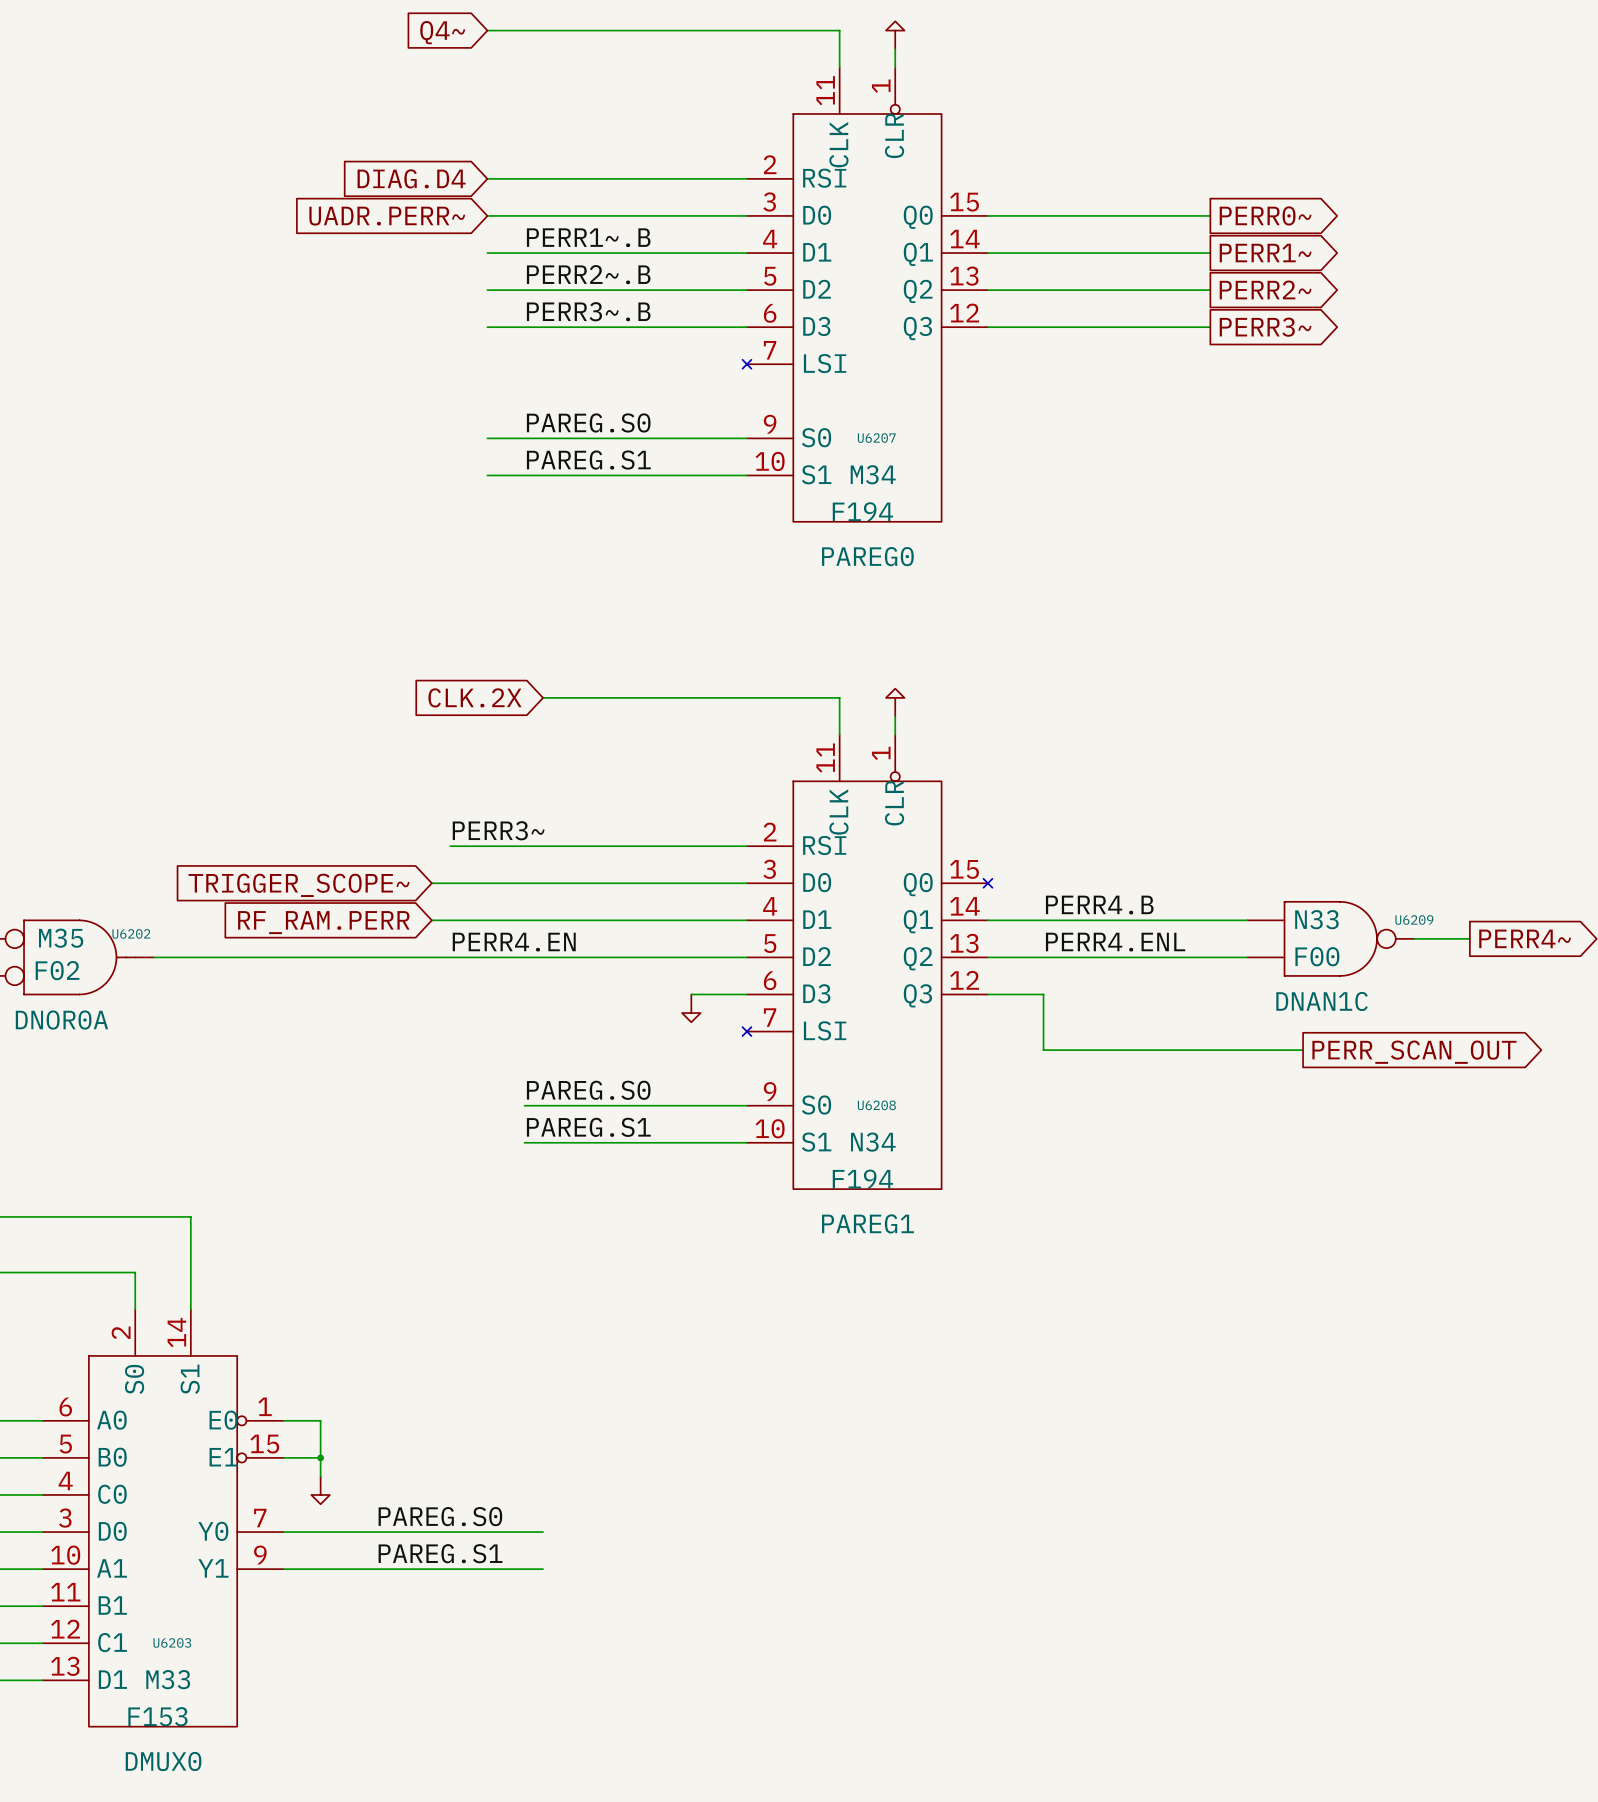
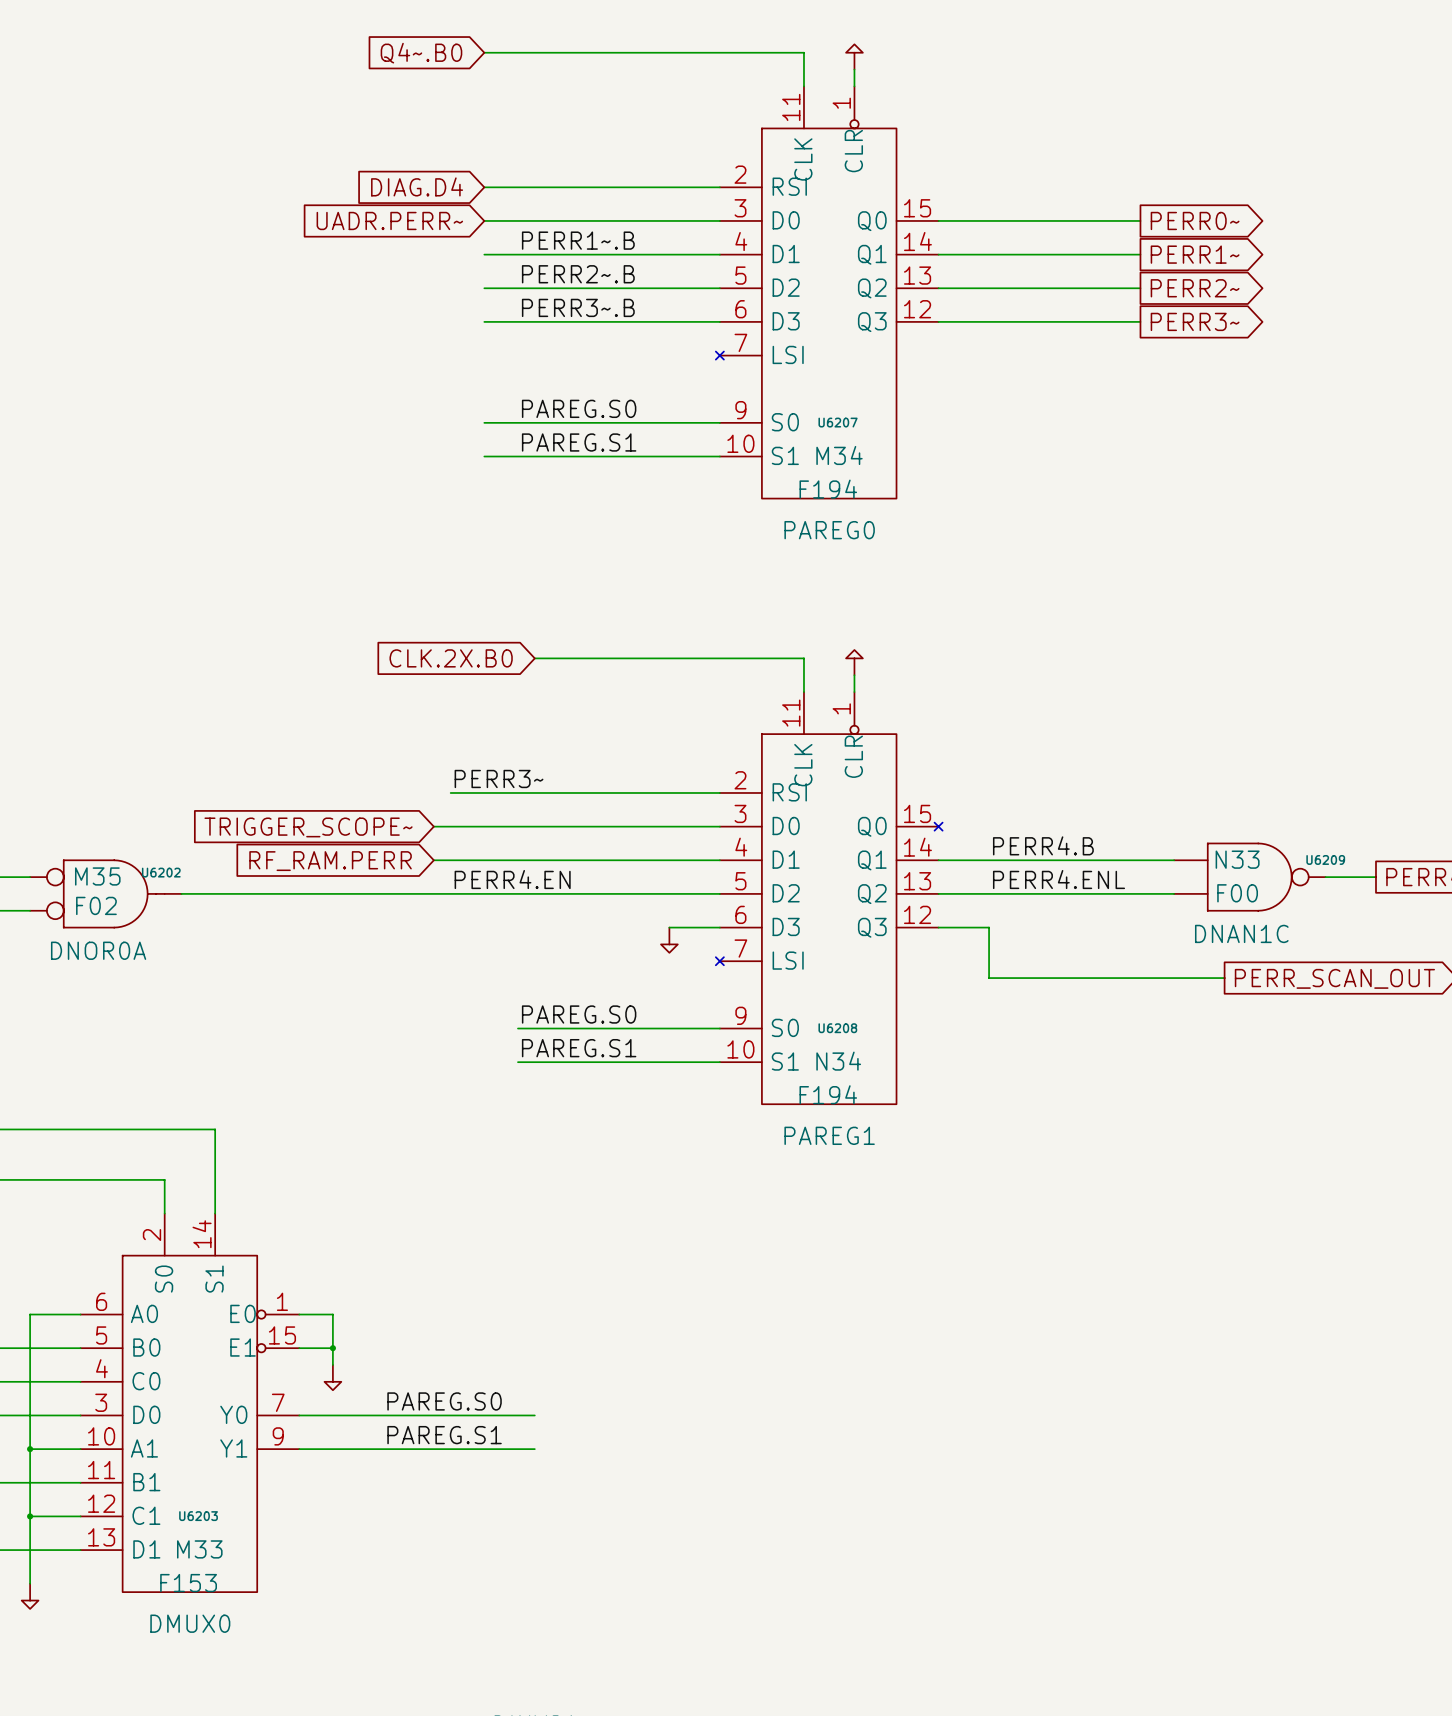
global label: Q4~ (442, 32) -> Q4~.B0 (421, 53)
global label: CLK.2X (474, 697) -> CLK.2X.B0 (451, 658)

